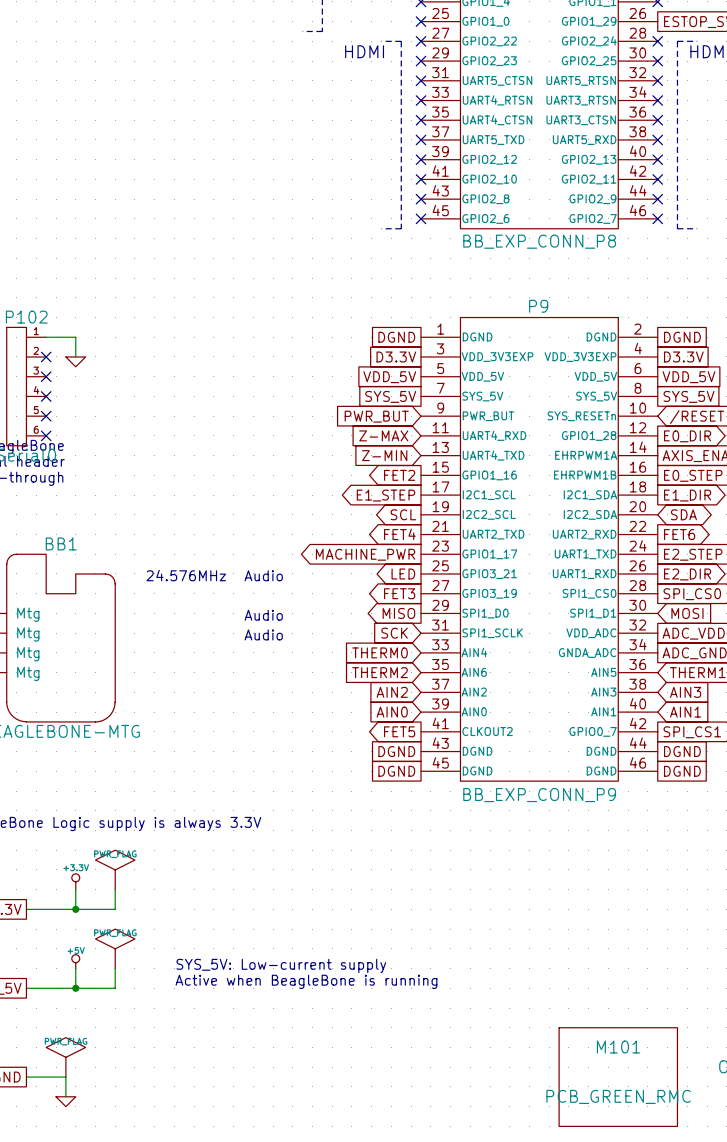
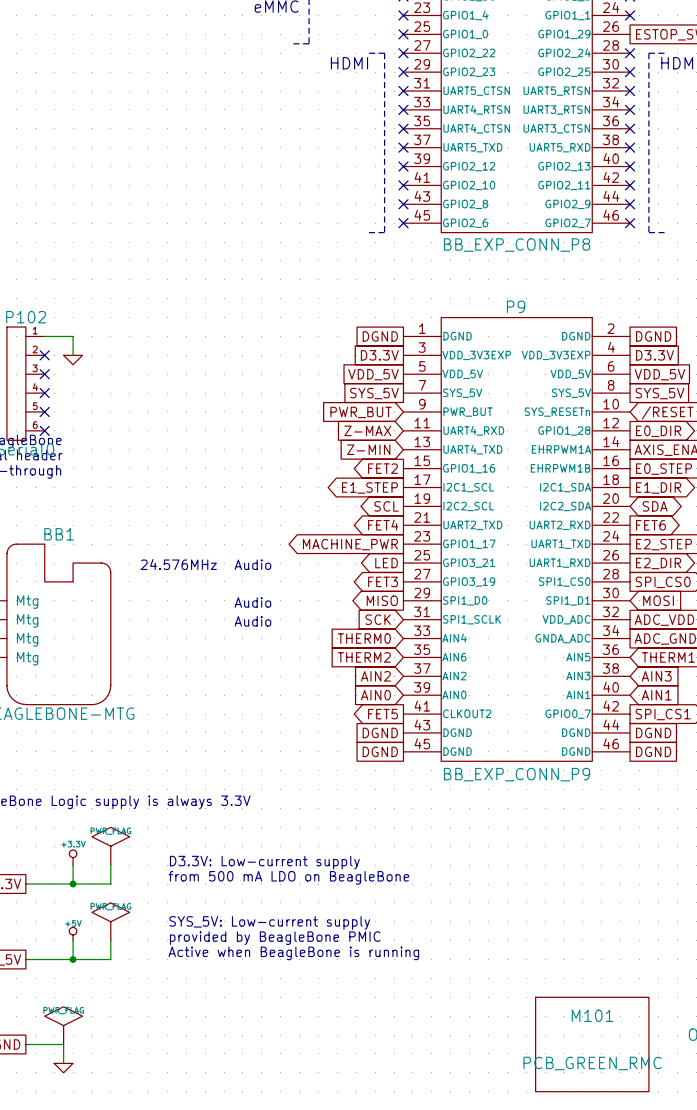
text: none -> D3.3V: Low-current supply (264, 862)
text: none -> from 500 mA LDO on BeagleBone (288, 877)
text: none -> SYS_5V: Low-current supply (269, 922)
text: SYS_5V: Low-current supply (281, 965) -> provided by BeagleBone PMIC (275, 938)

